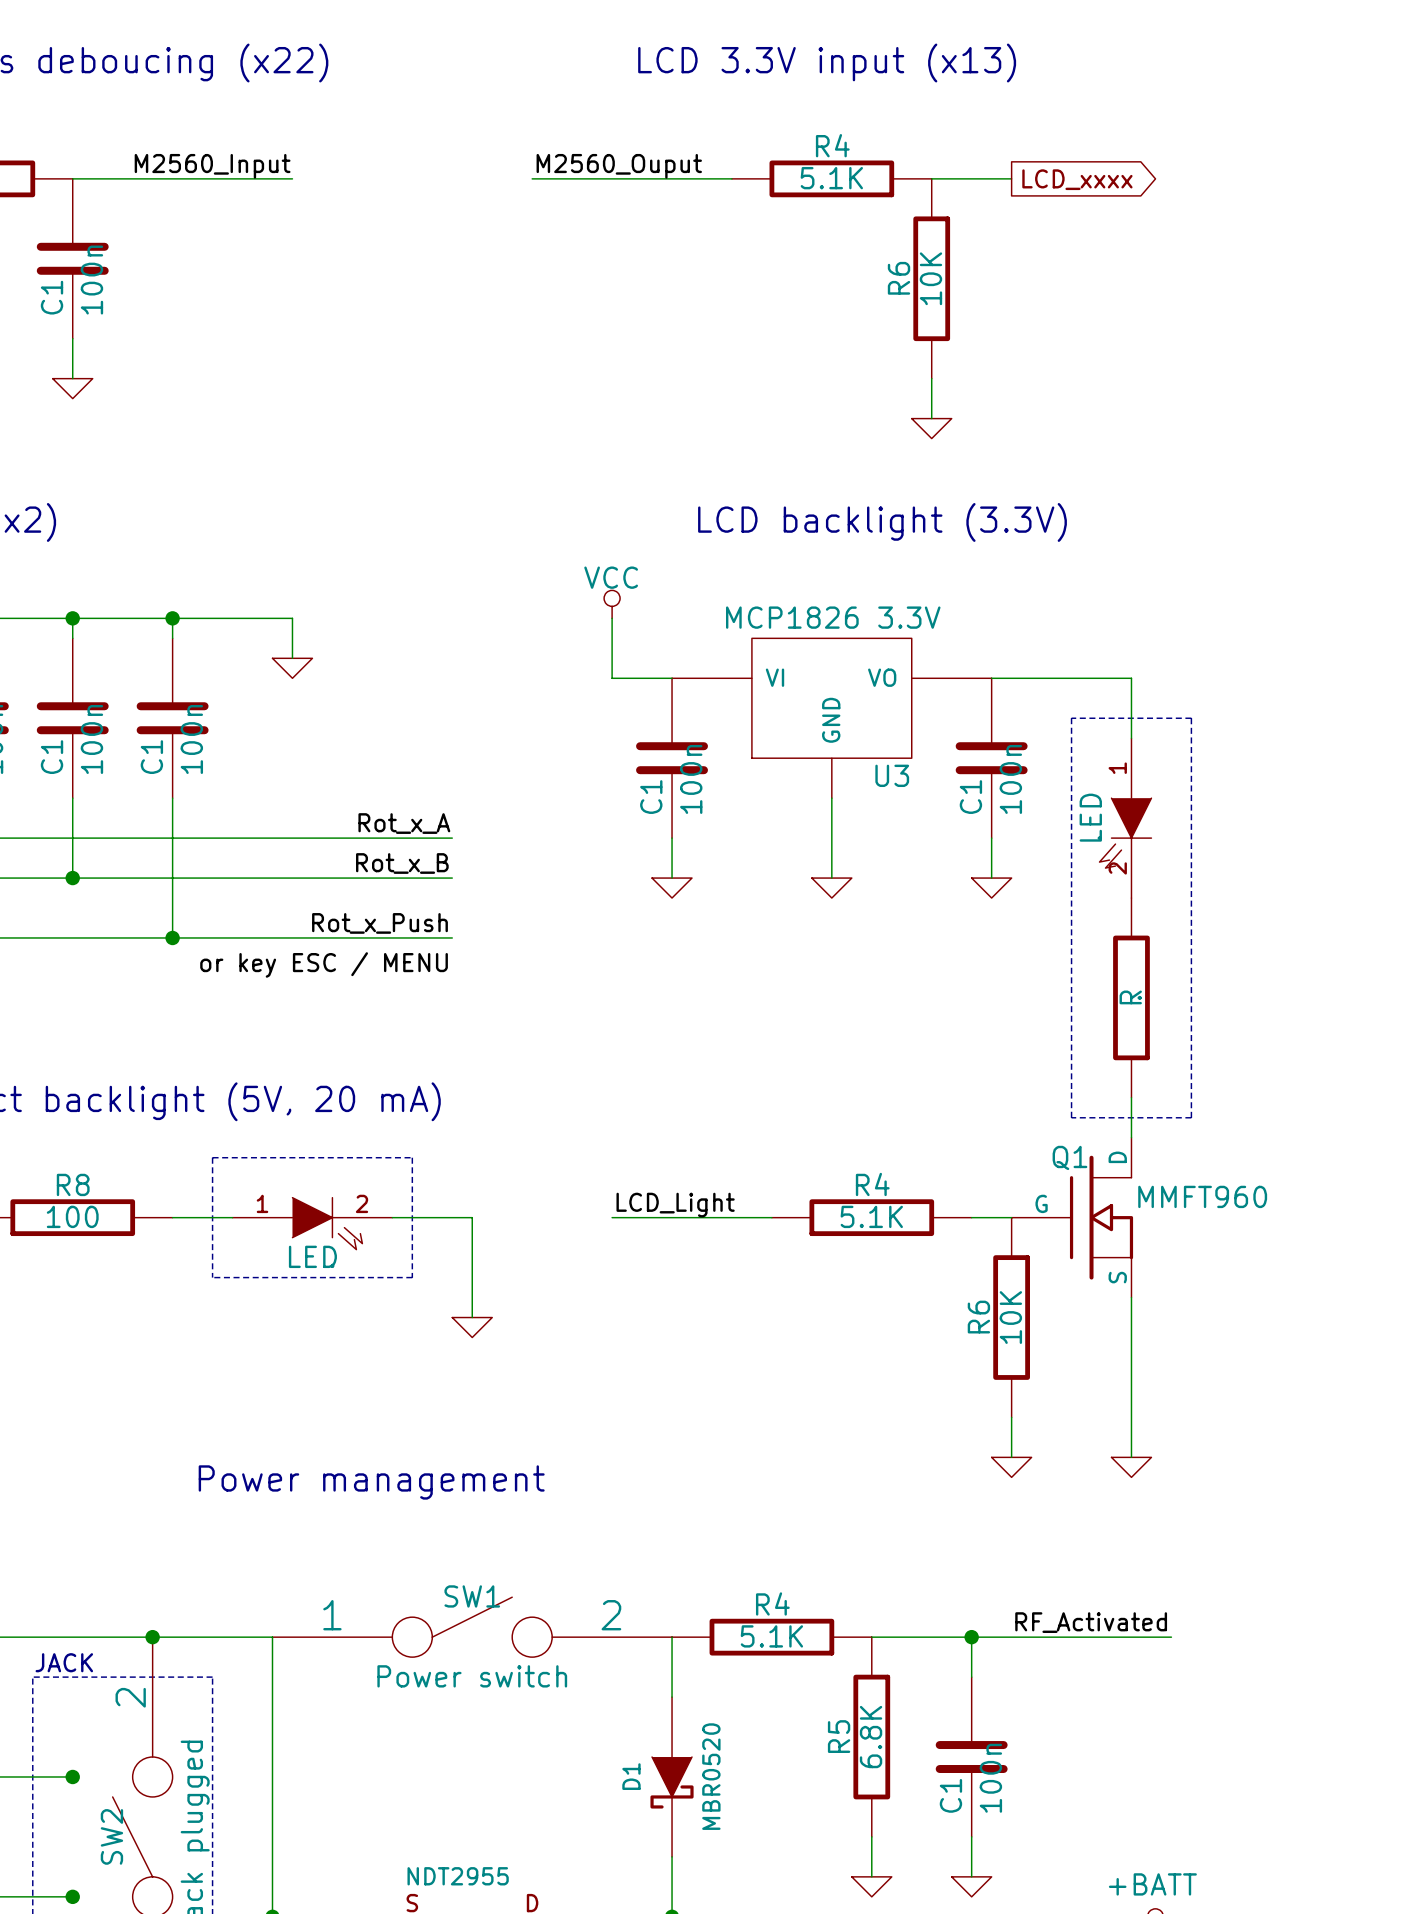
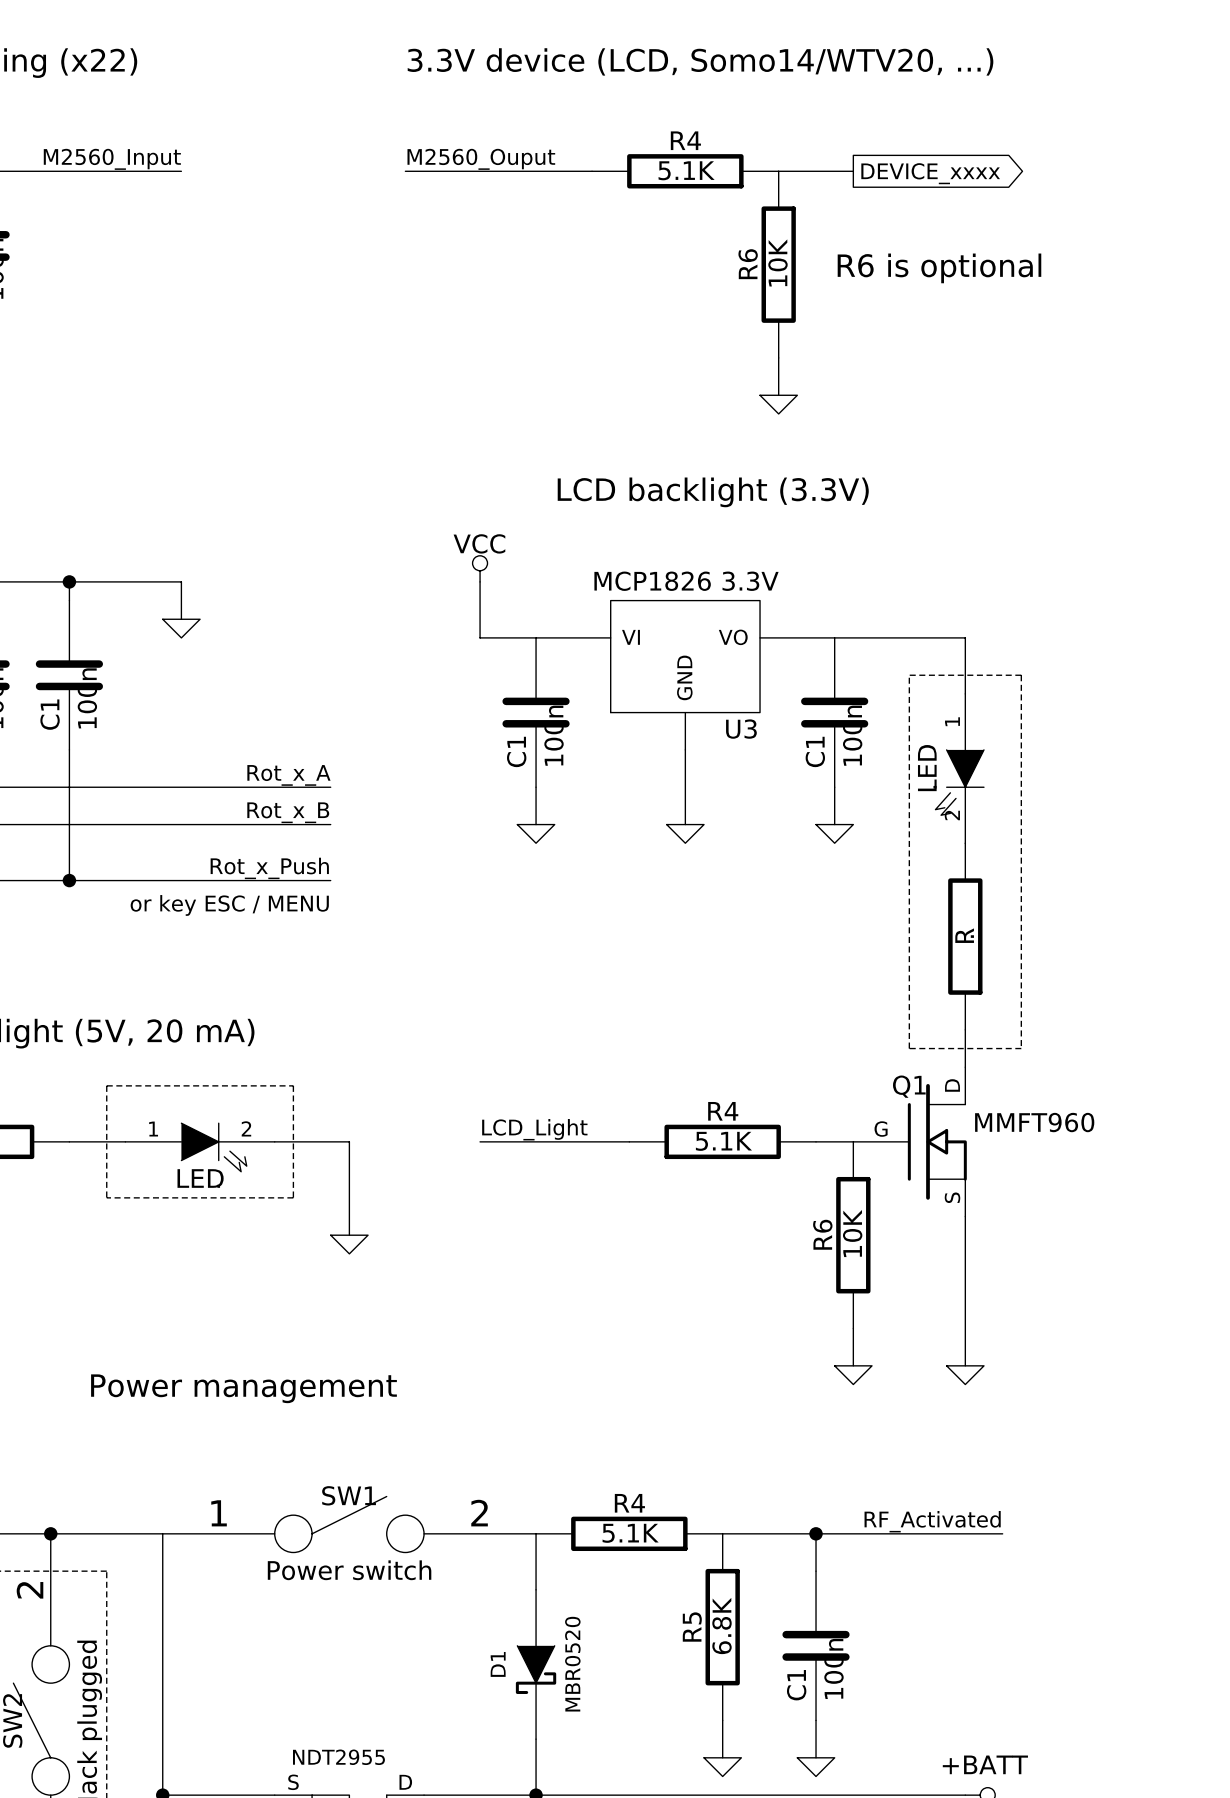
text: LCD 3.3V input (x13) (827, 63) -> none
text: none -> 3.3V device (LCD, Somo14/WTV20, ...) (700, 61)
global label: LCD_xxxx (1077, 179) -> DEVICE_xxxx (930, 173)
text: none -> R6 is optional (939, 268)

